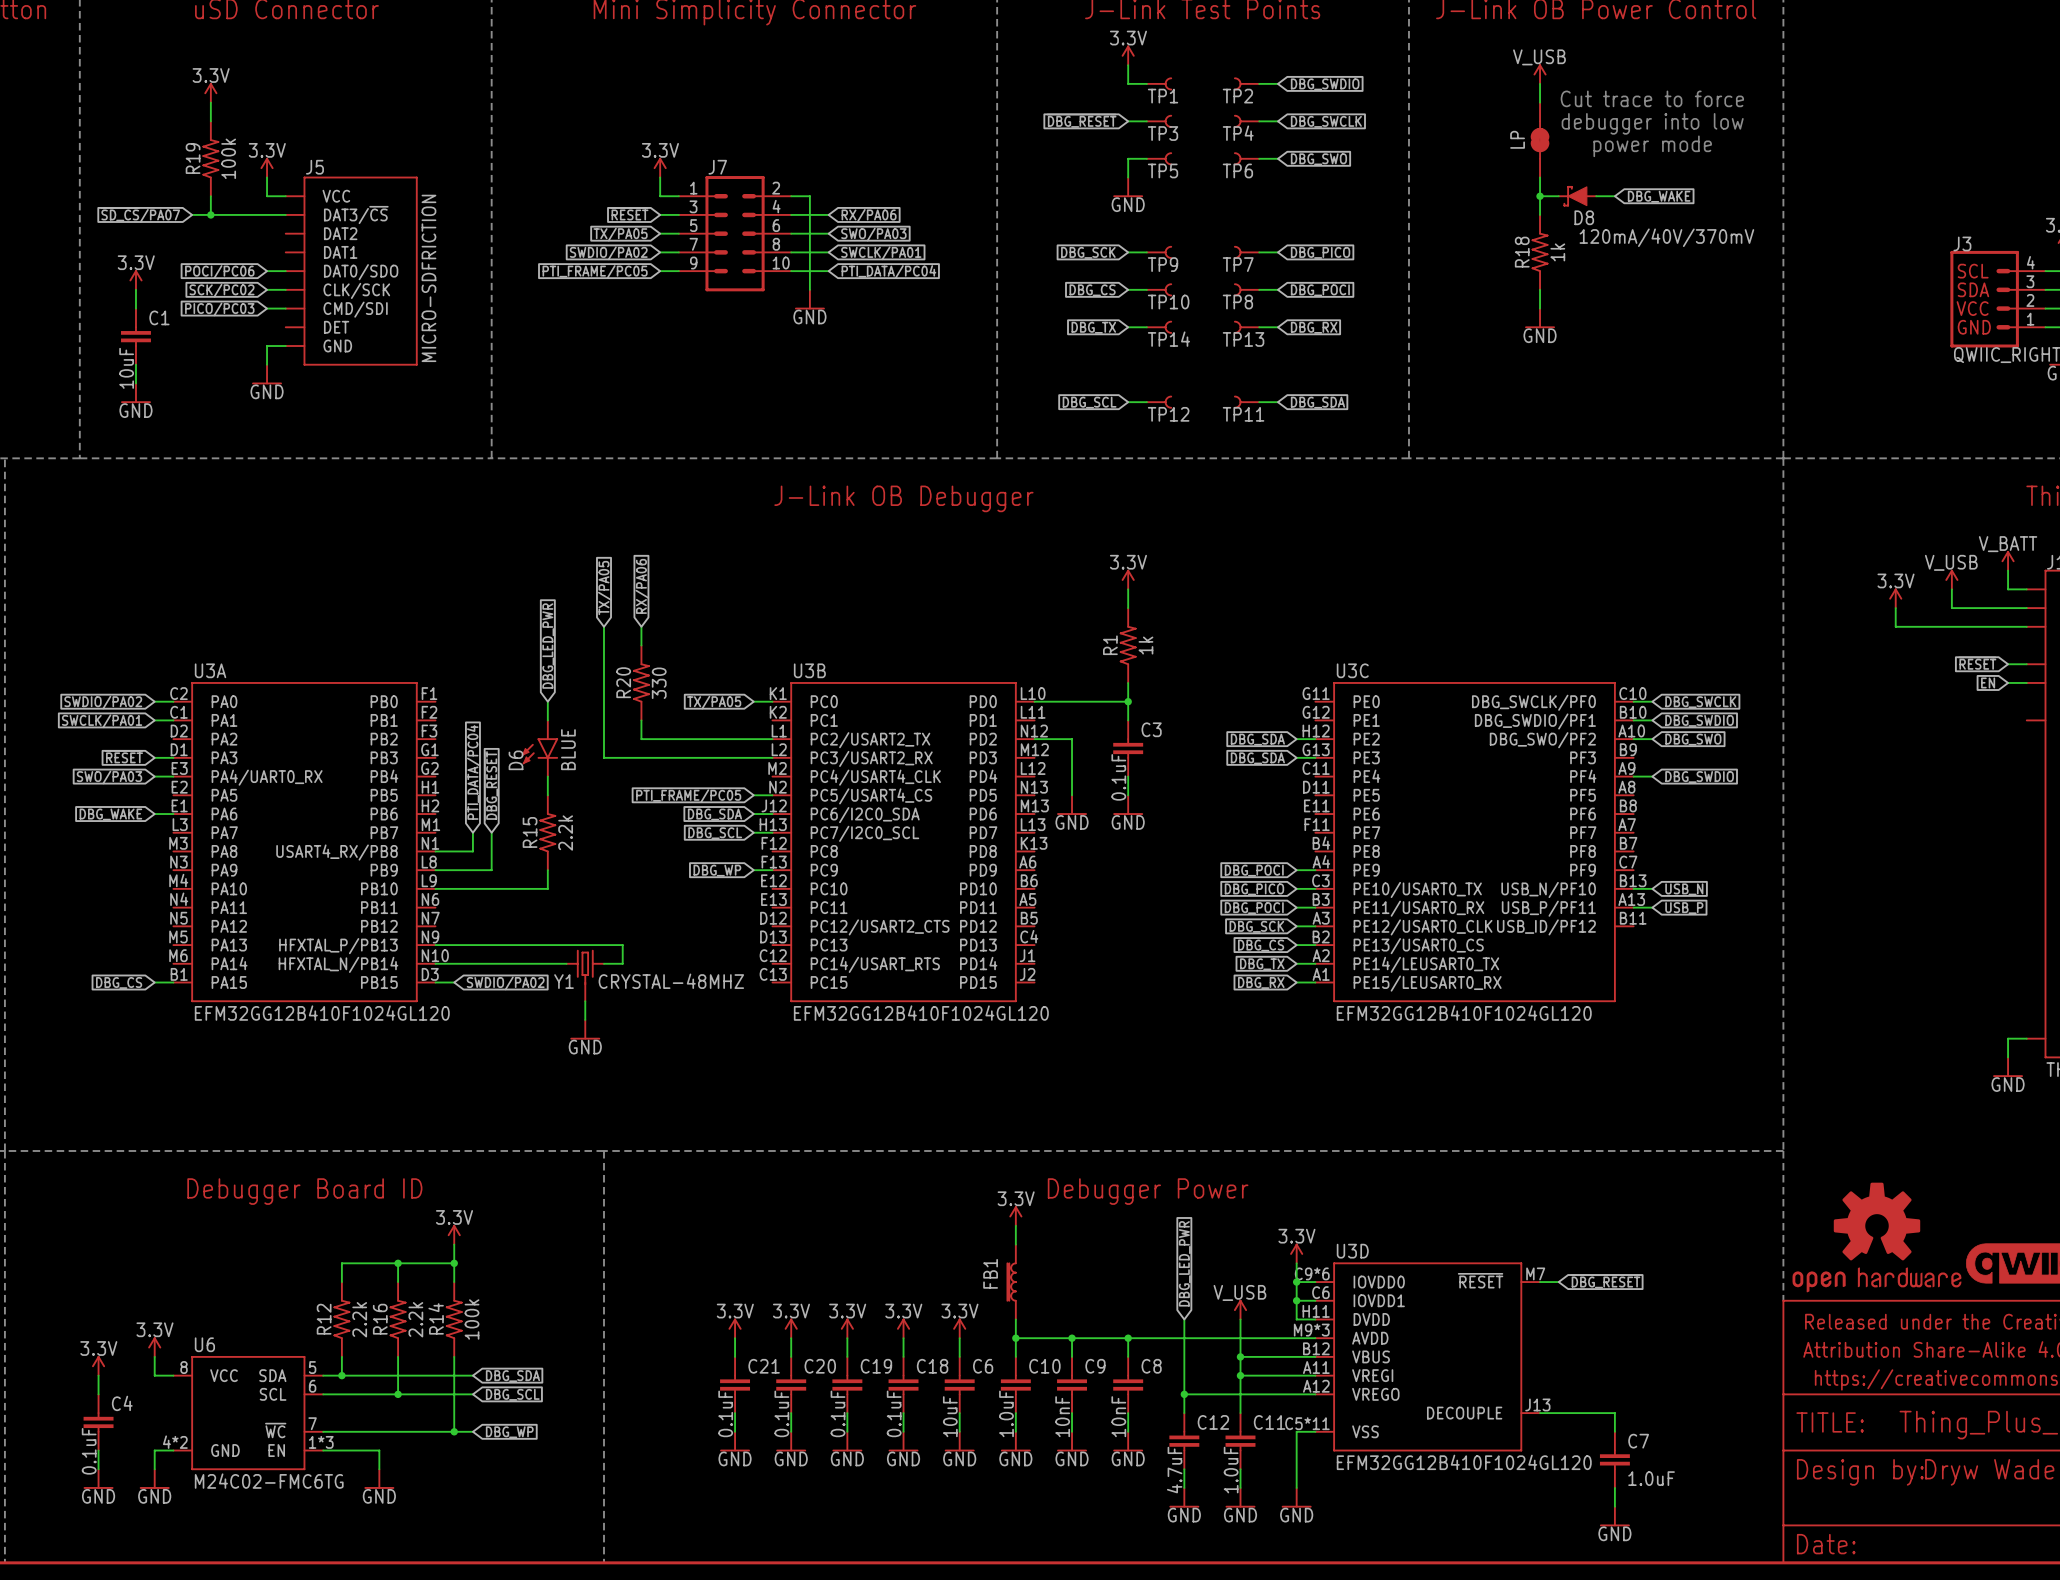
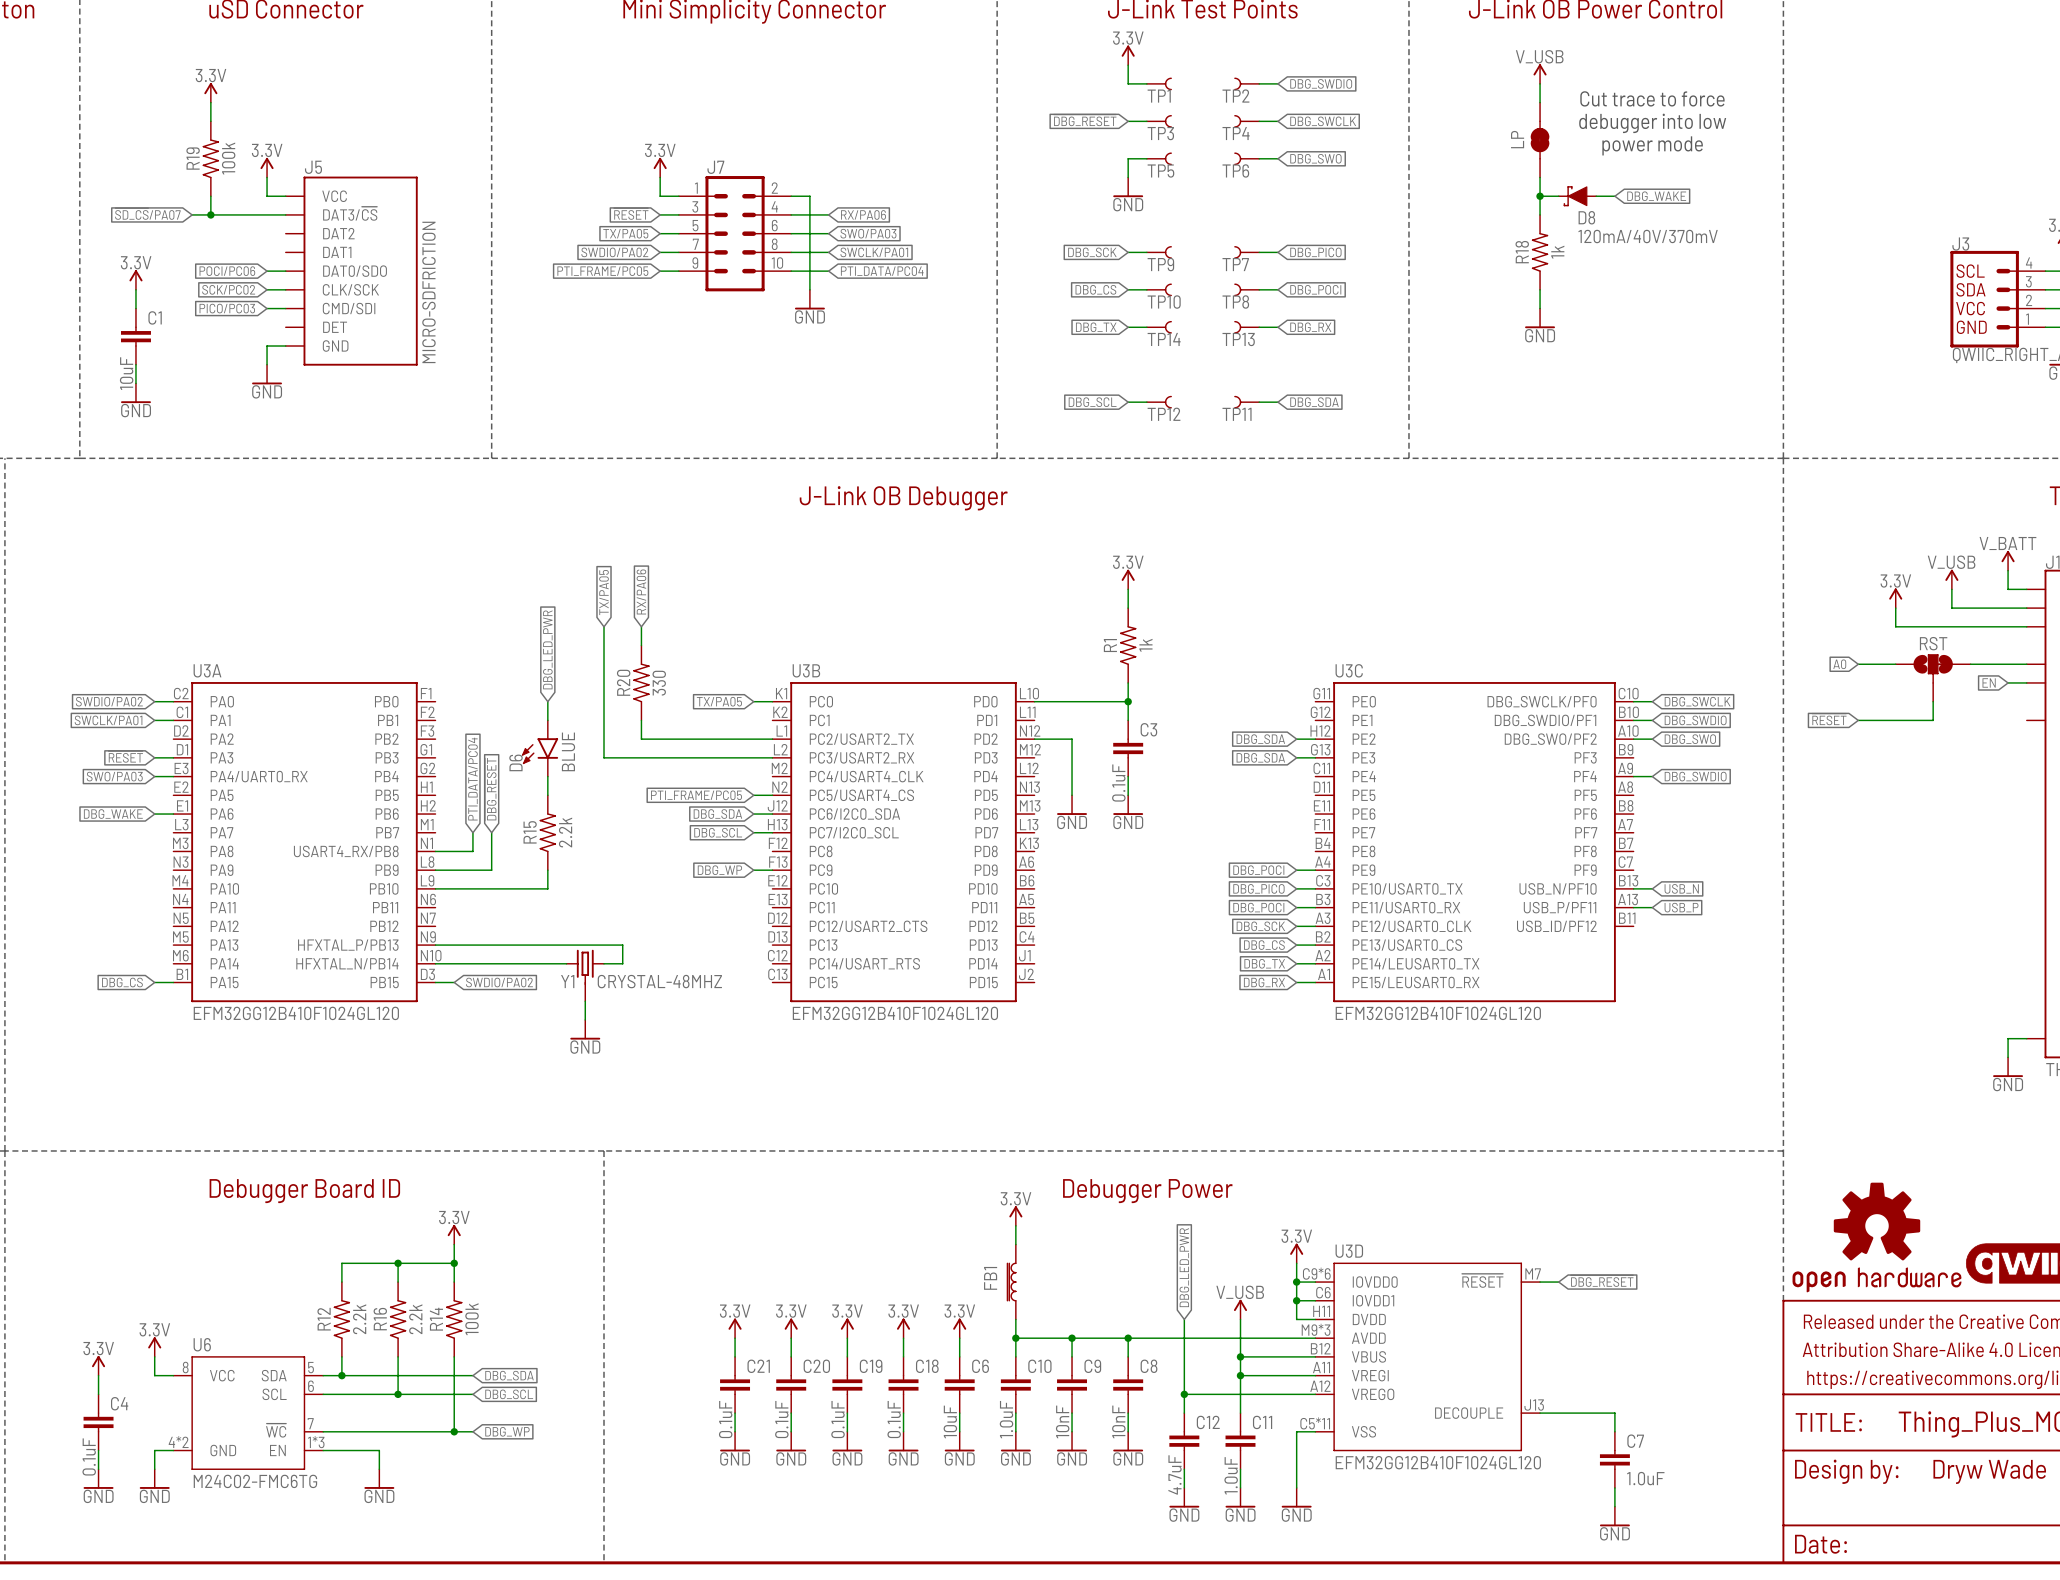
global label position: ~{RESET} (1977, 663) -> ~{RESET} (1829, 719)
global label: none -> A0 (1839, 664)
wire: none -> (1858, 664) (1895, 664)
wire: none -> (1970, 664) (2008, 664)
RST: none -> (1933, 678)
wire: none -> (1933, 701) (1933, 720) (1858, 720)

